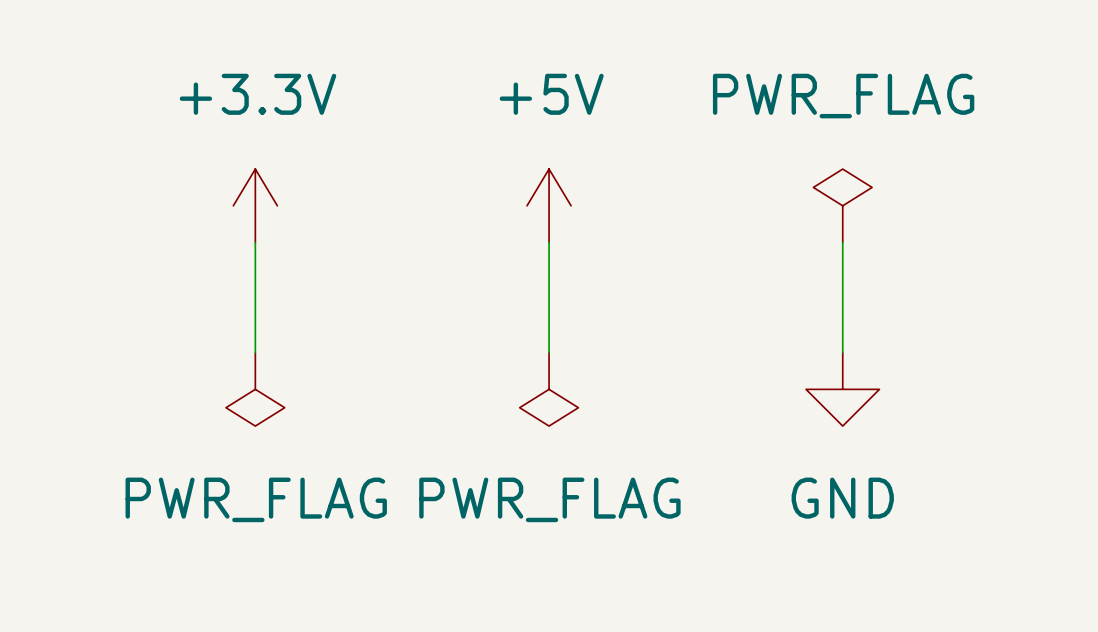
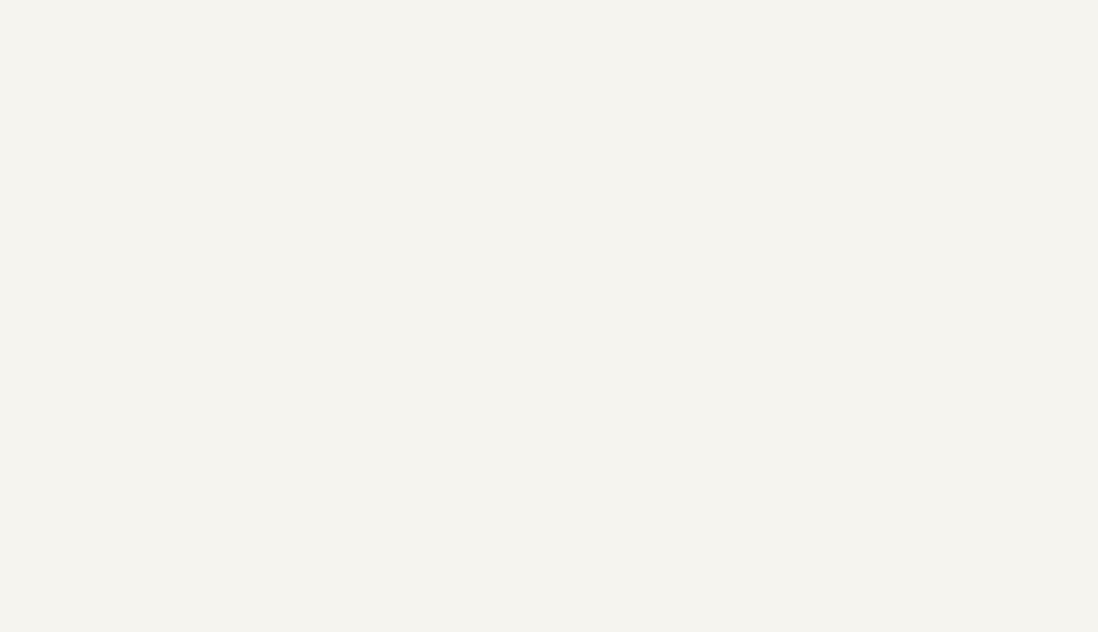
power symbol: +3.3V (255, 205) -> none
power symbol: +5V (549, 205) -> none
power symbol: PWR_FLAG (842, 205) -> none
wire: (255, 242) (255, 352) -> none
wire: (549, 242) (549, 352) -> none
wire: (842, 242) (842, 352) -> none
power symbol: PWR_FLAG (255, 389) -> none
power symbol: PWR_FLAG (549, 389) -> none
power symbol: GND (842, 389) -> none

